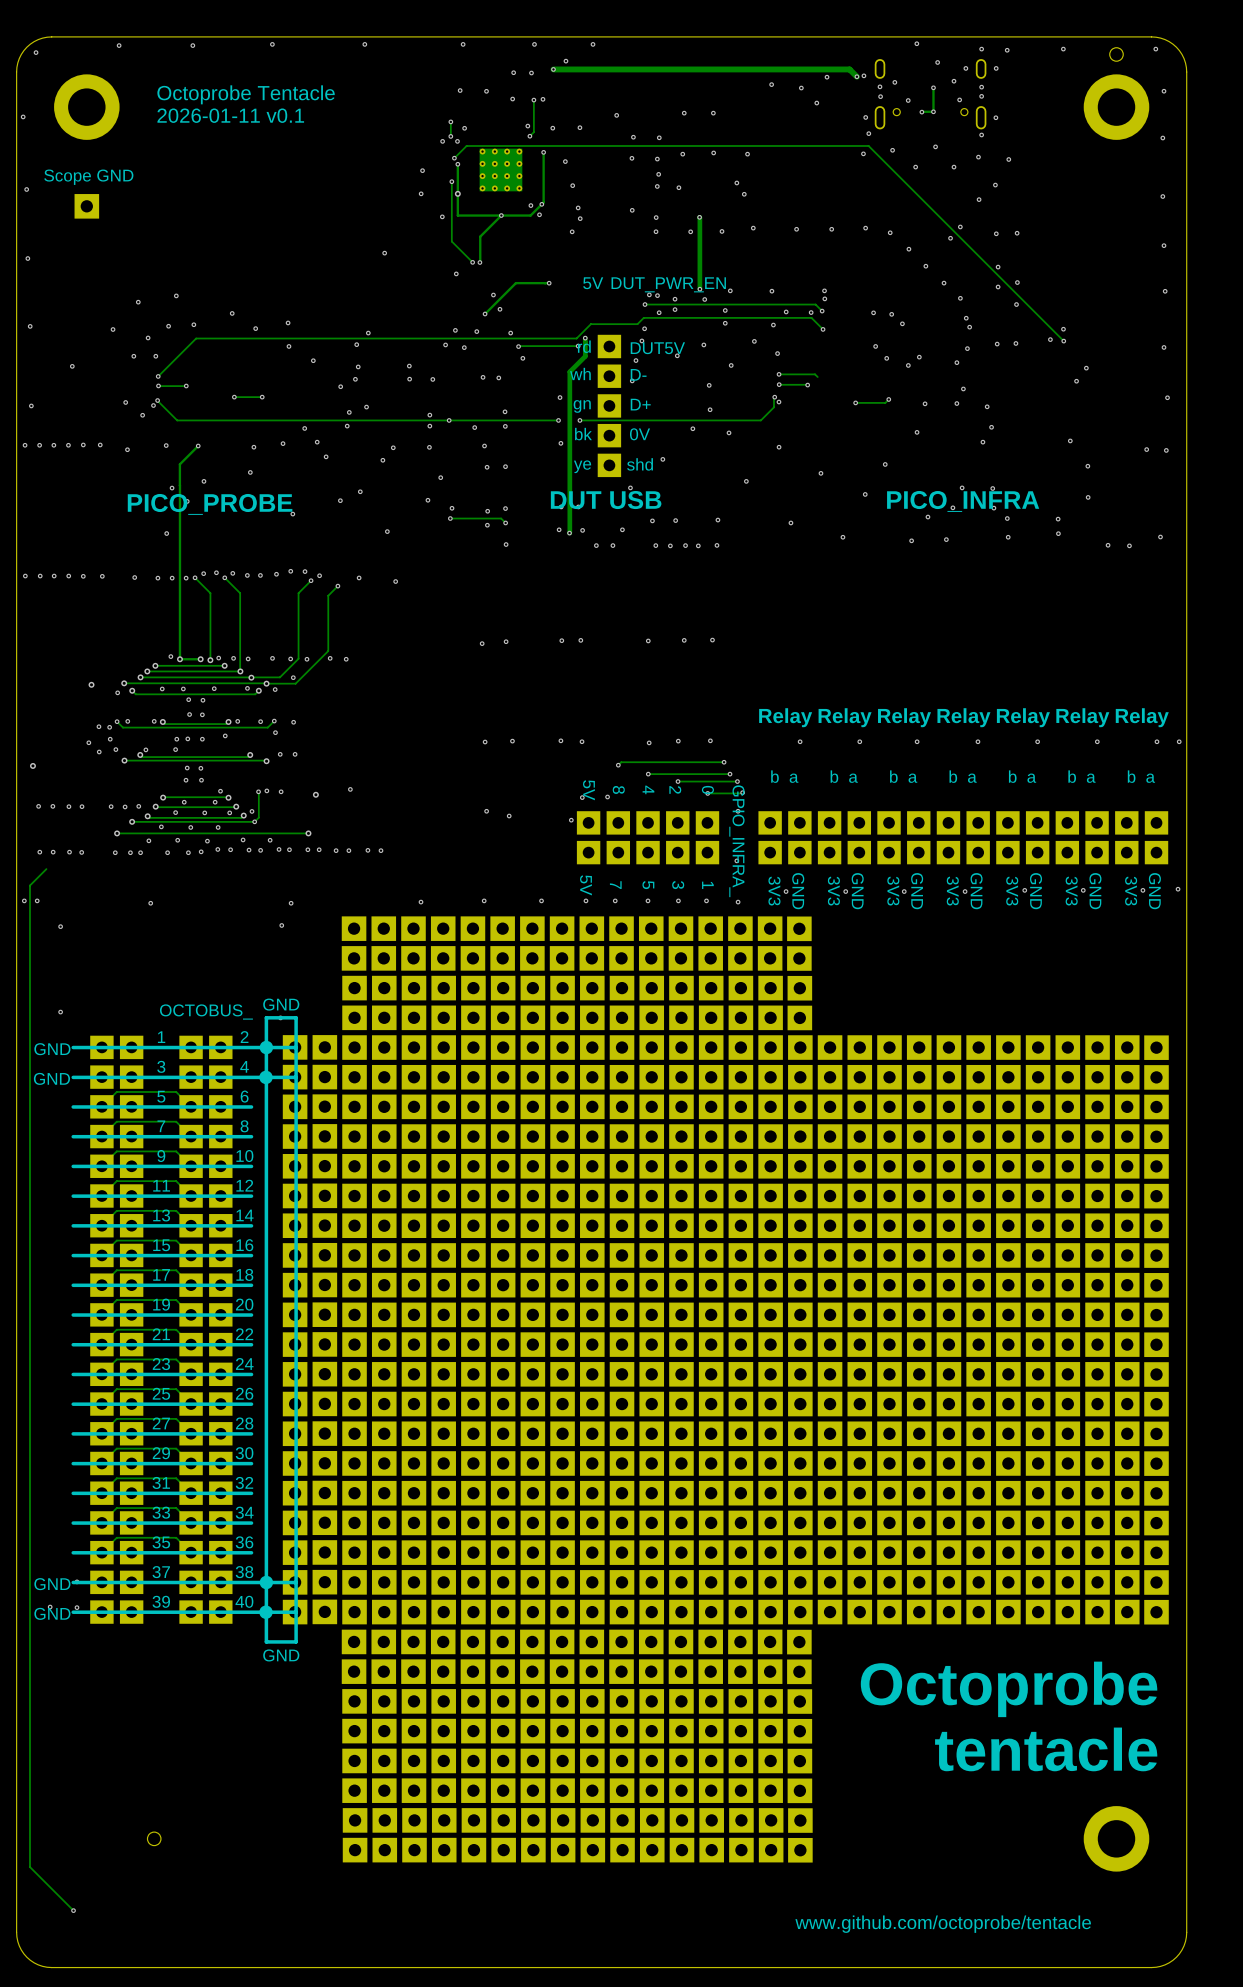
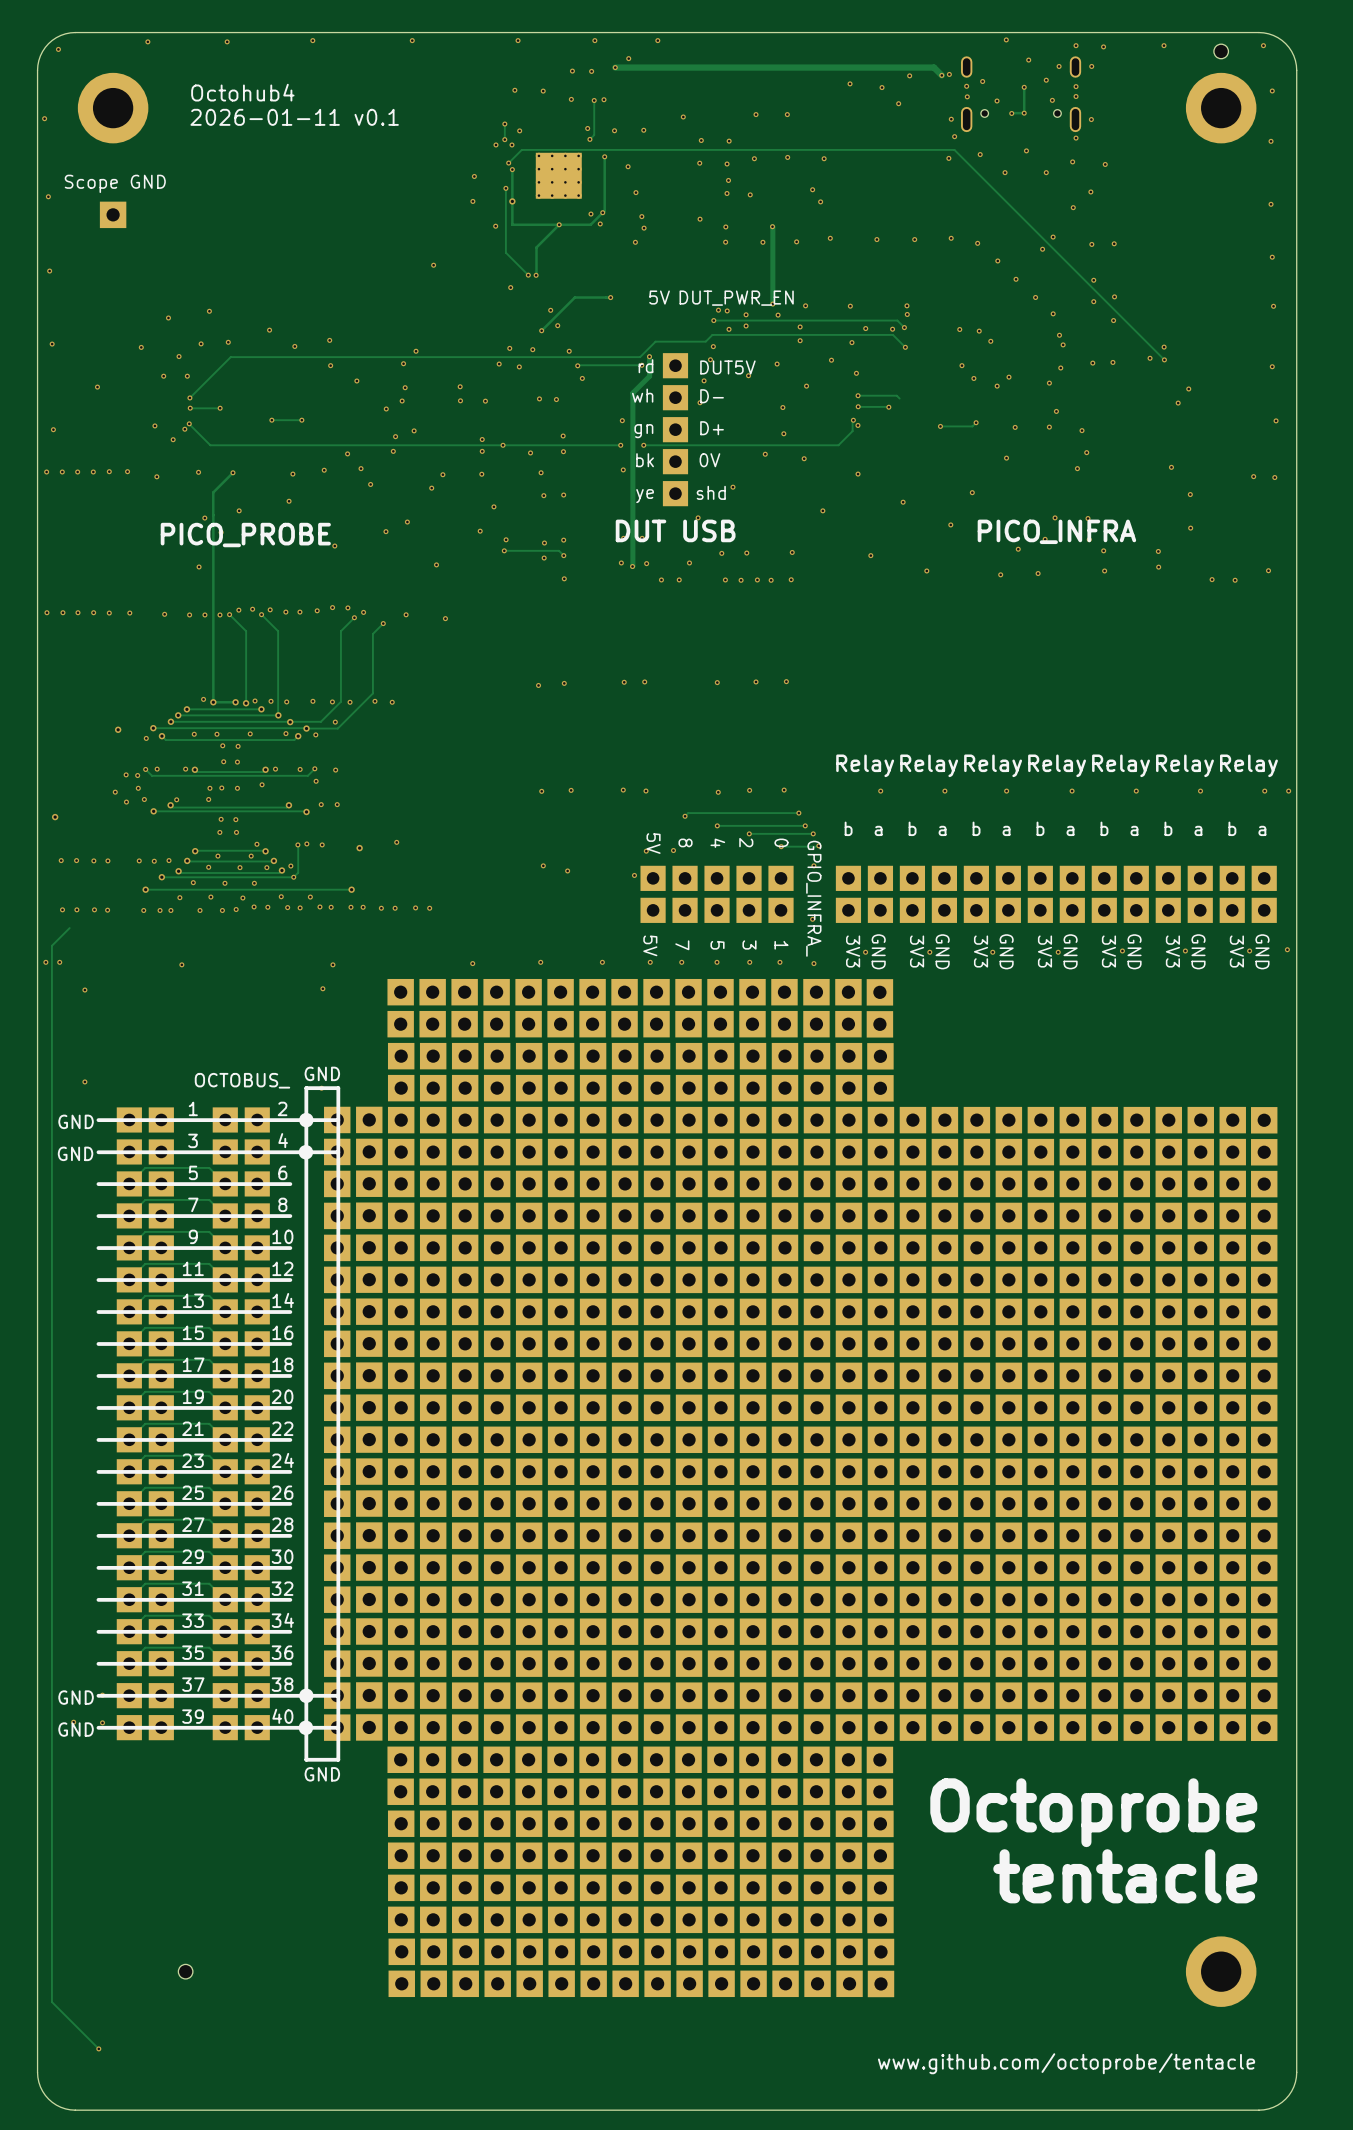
text: Octoprobe Tentacle (246, 94) -> Octohub4 (242, 92)

